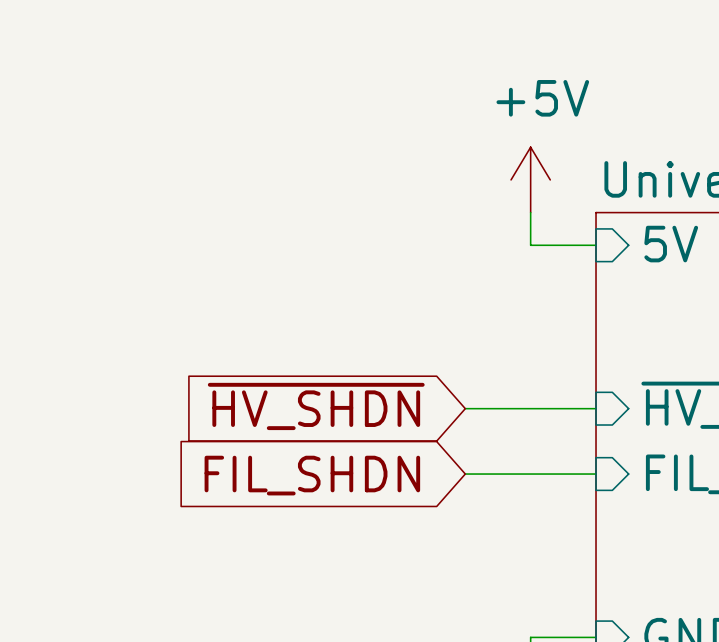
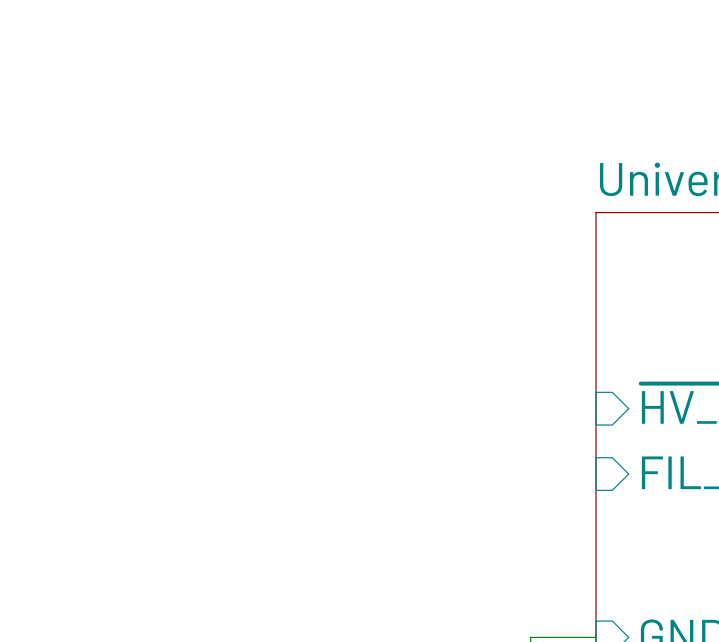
power symbol: +5V (530, 179) -> none
wire: (530, 212) (530, 245) (596, 245) -> none
sheet pin: 5V (671, 244) -> none
global label: ~{HV_SHDN} (316, 406) -> none
wire: (465, 408) (596, 408) -> none
wire: (465, 474) (596, 474) -> none
global label: FIL_SHDN (312, 475) -> none

